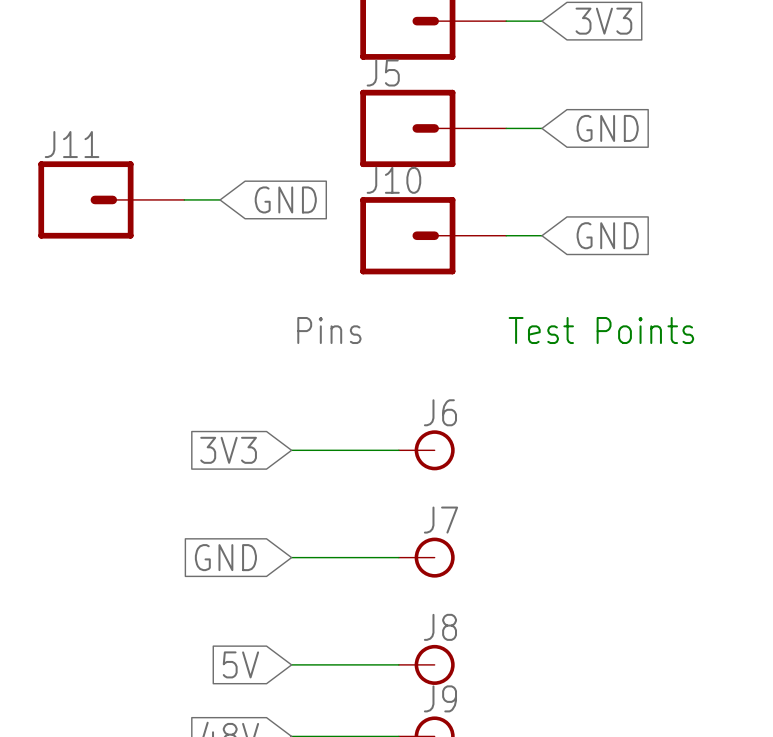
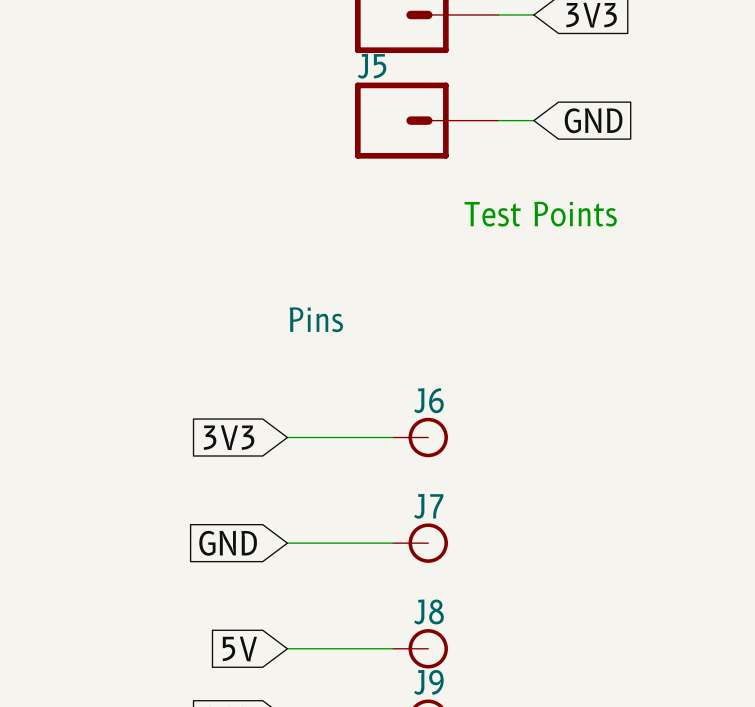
J11: (111, 199) -> none
wire: (184, 199) (220, 199) -> none
global label: GND (285, 199) -> none
J10: (433, 235) -> none
wire: (506, 235) (541, 235) -> none
global label: GND (607, 235) -> none
text position: Test Points (601, 330) -> Test Points (540, 214)

